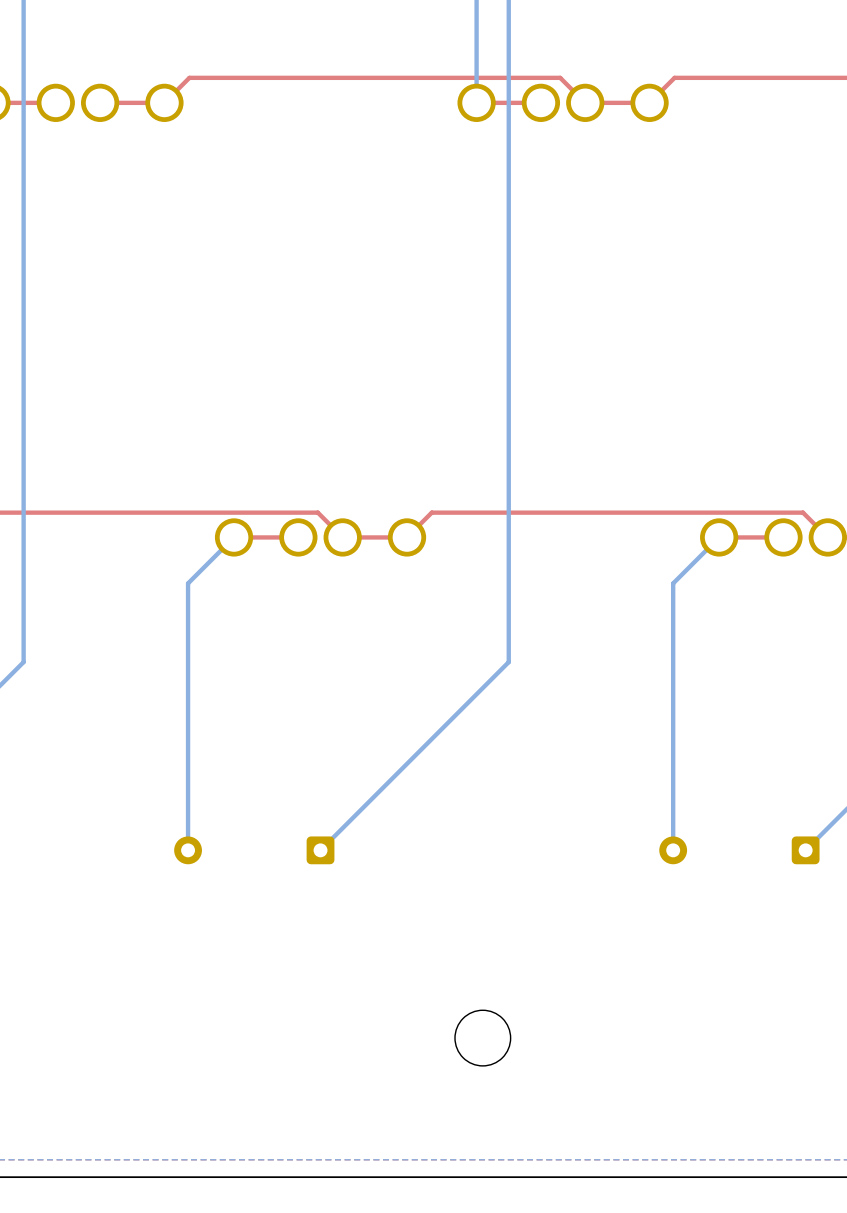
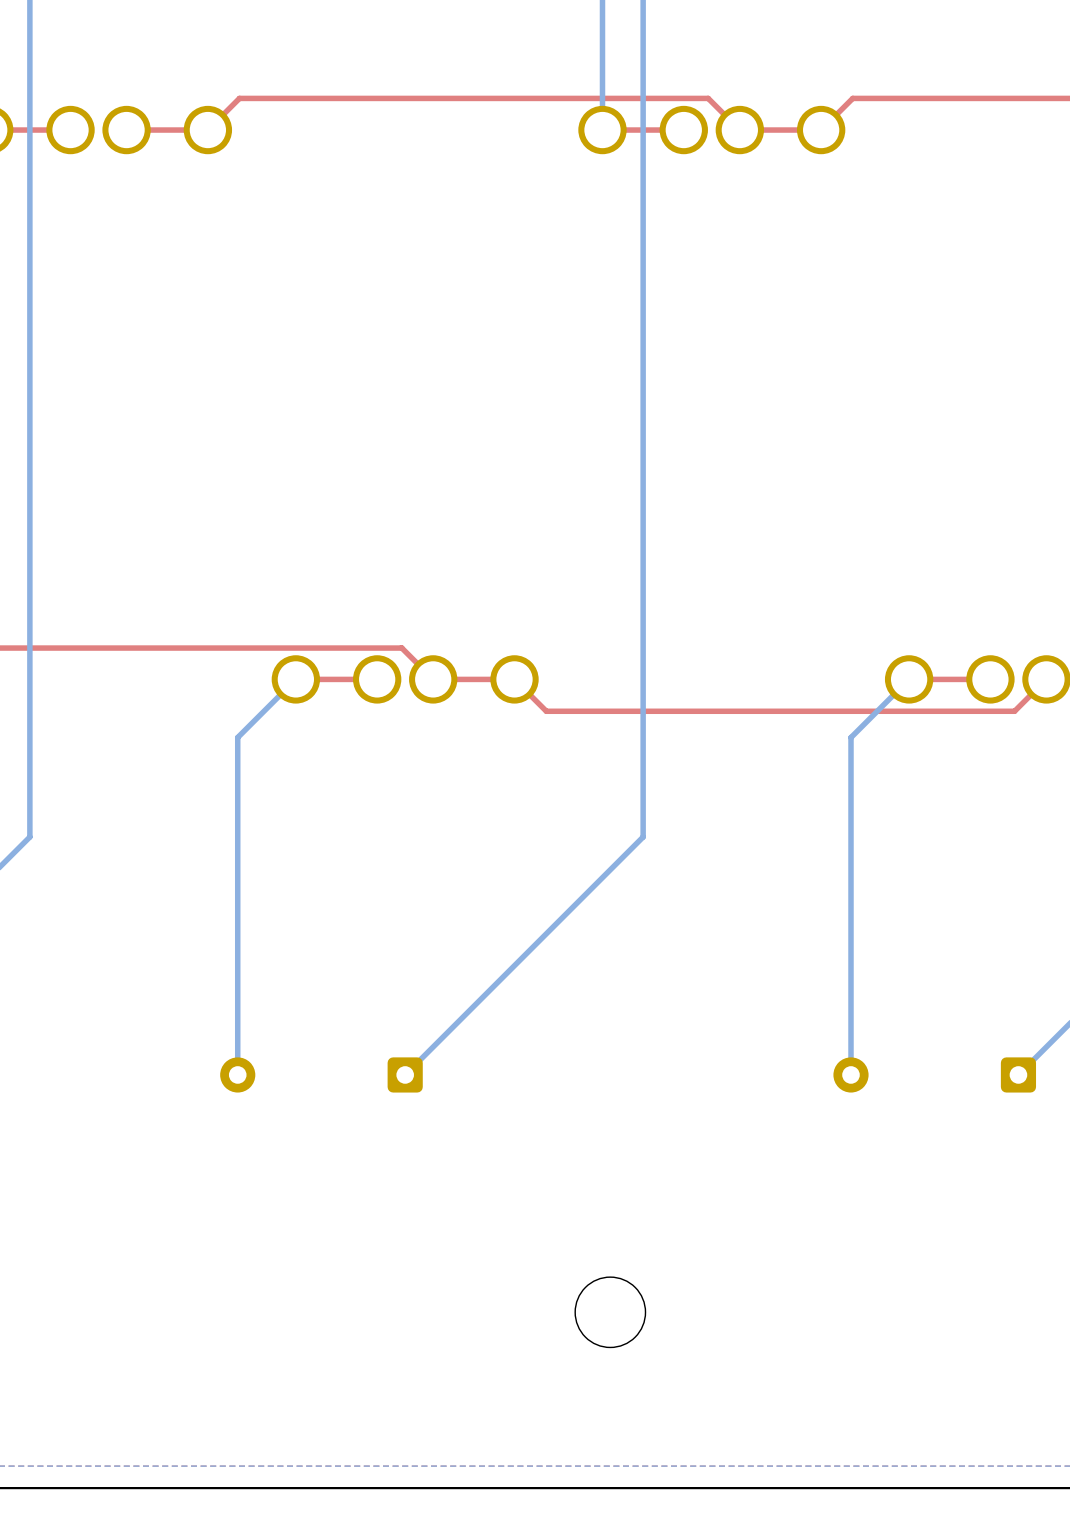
top track: (827, 537) (803, 512) (431, 512) (407, 537) -> (1046, 679) (1014, 711) (546, 711) (514, 679)

